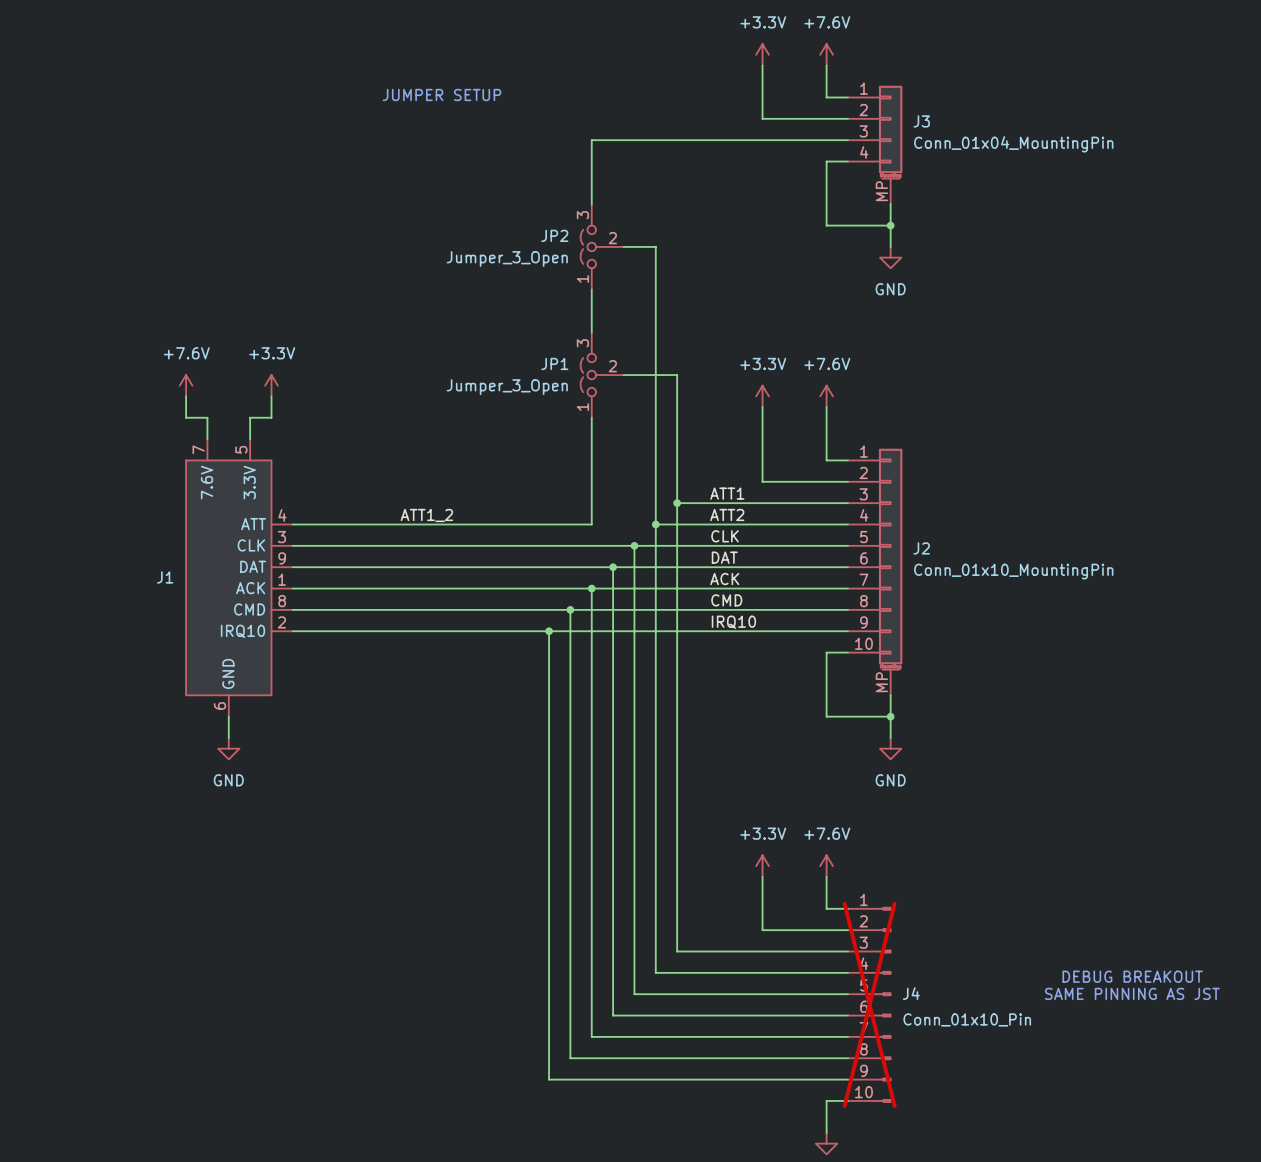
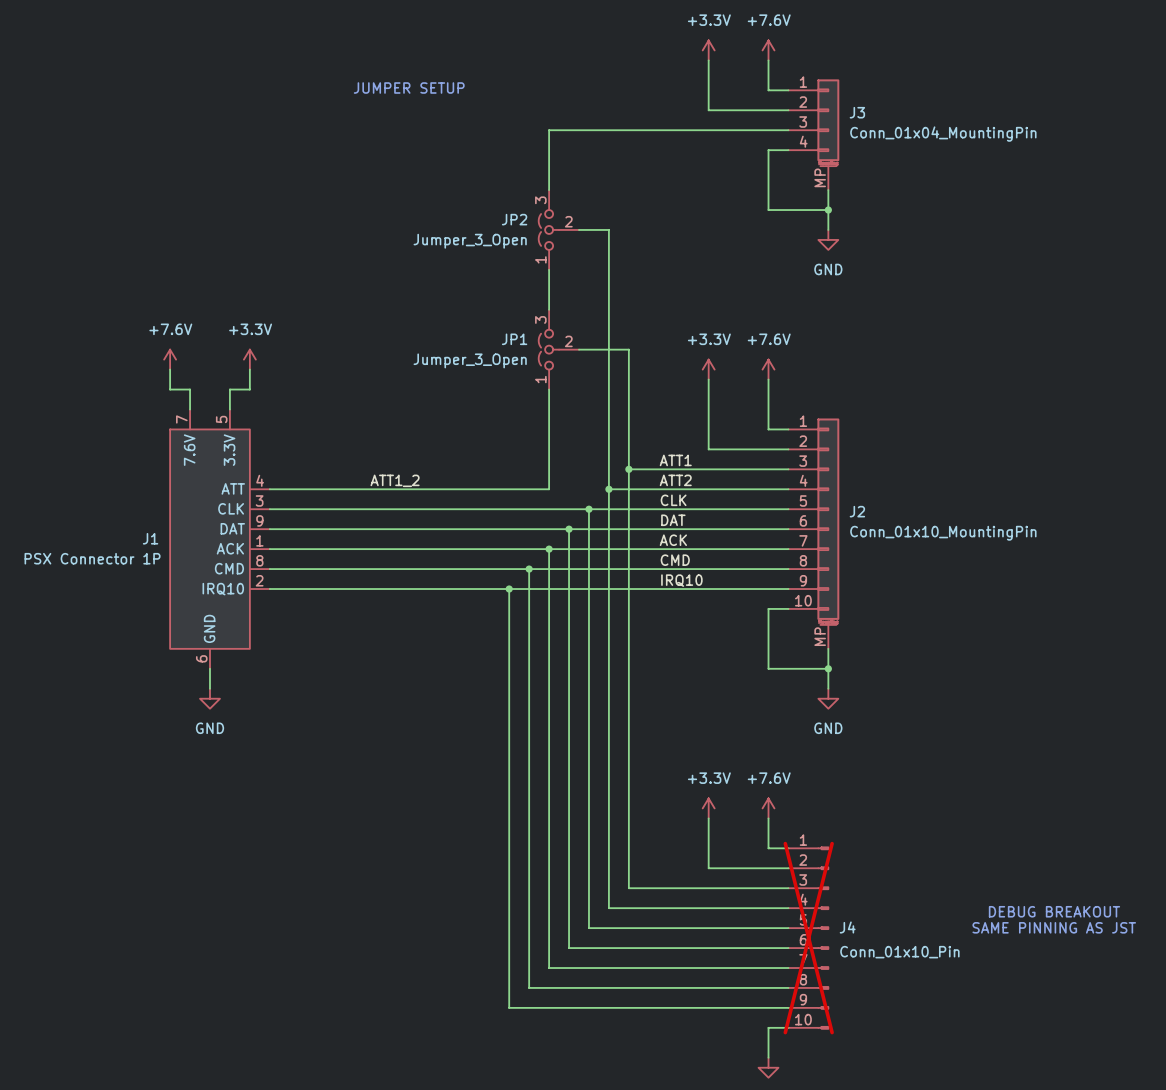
J1 value: none -> PSX Connector 1P (92, 558)

